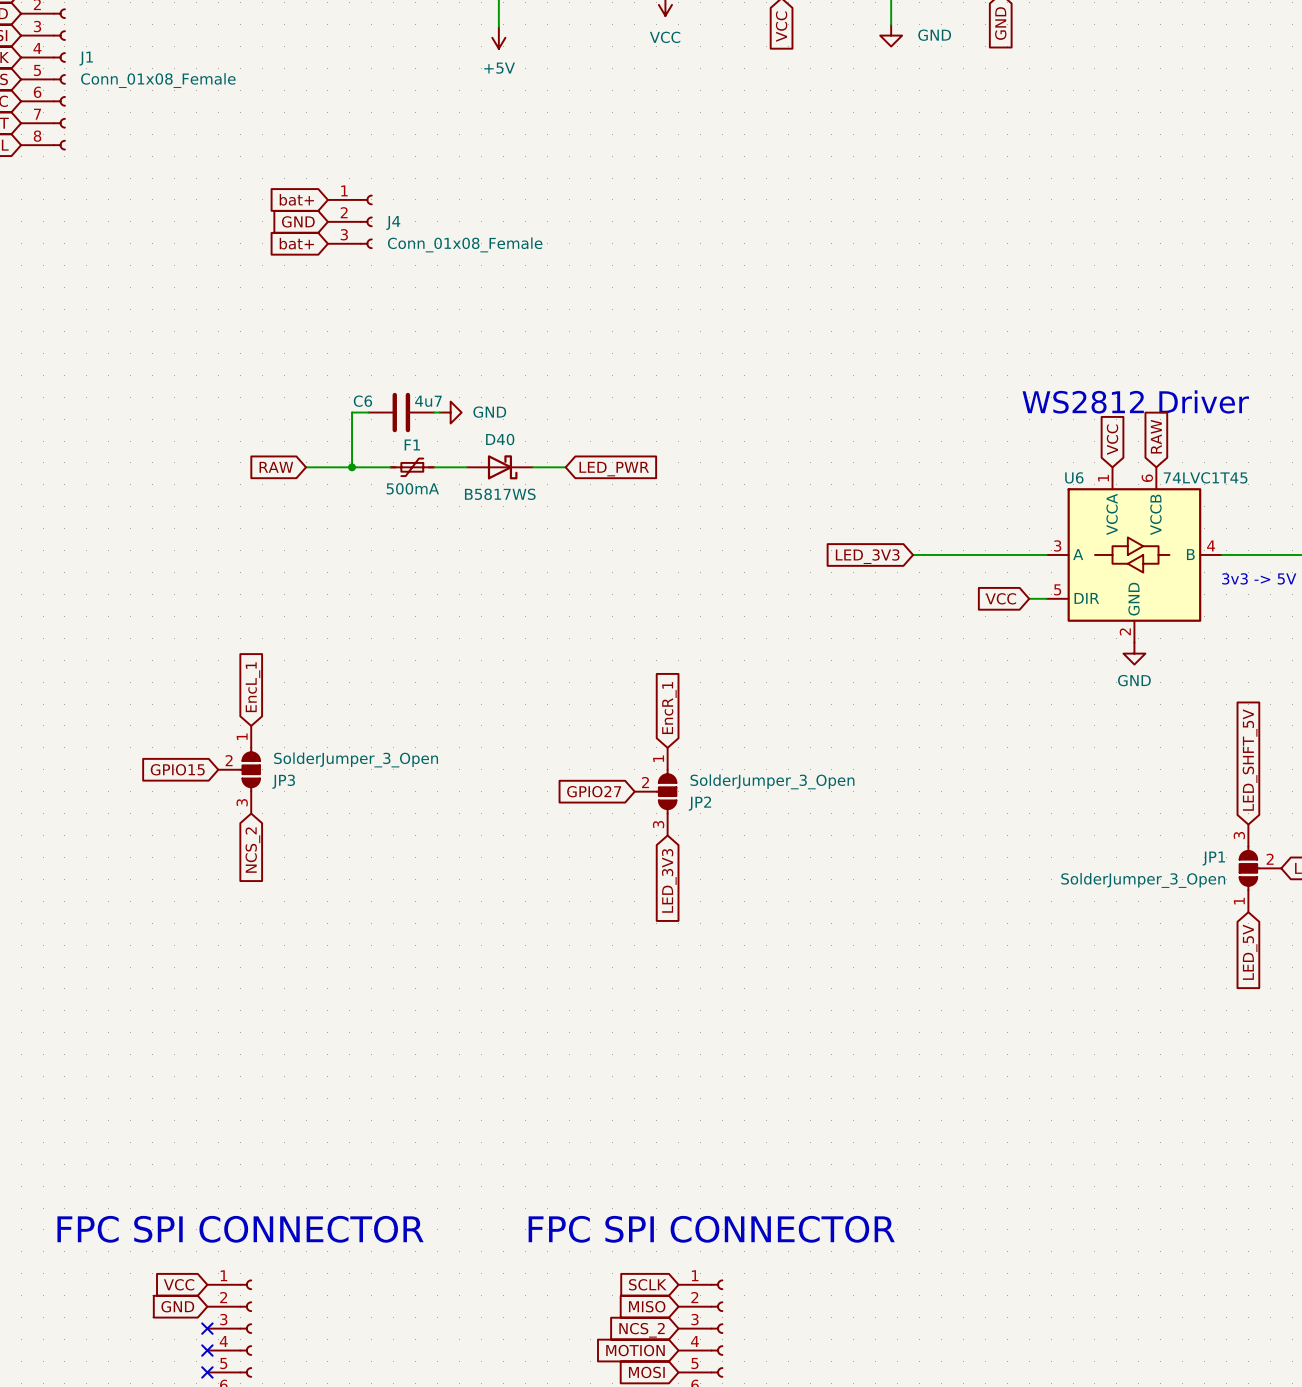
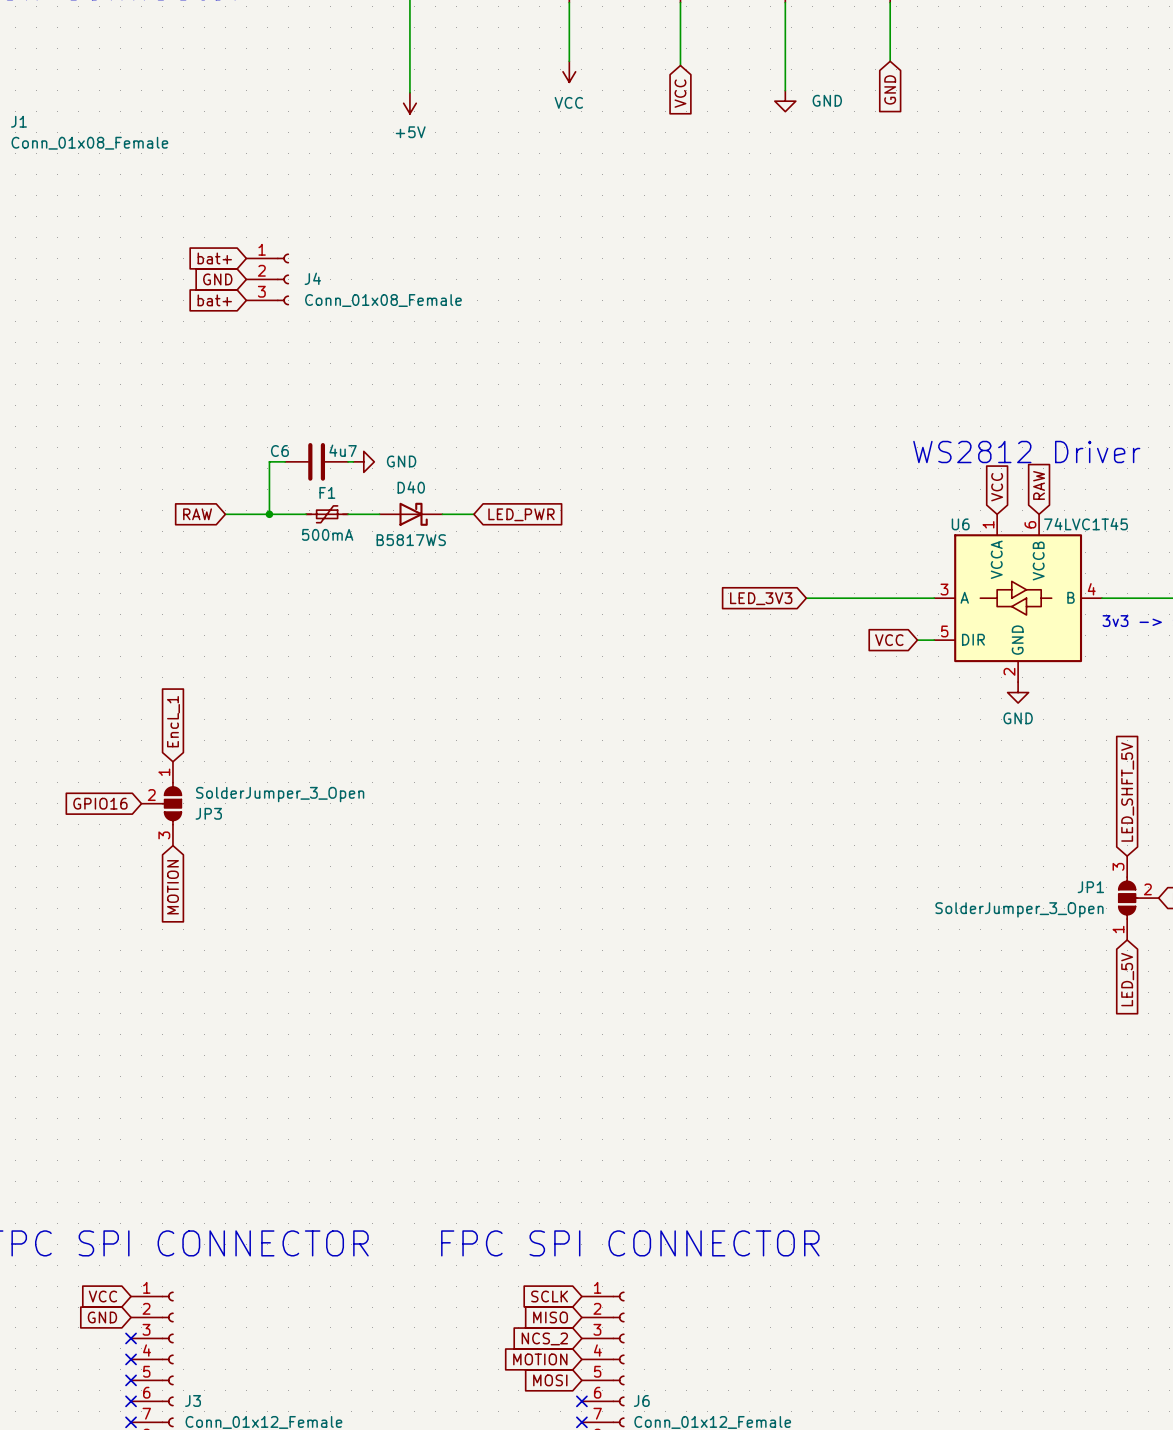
global label: EncR_1 (669, 708) -> none
global label: GPIO15 (177, 769) -> GPIO16 (100, 803)
global label: GPIO27 (594, 791) -> none
JP2: SolderJumper_3_Open (655, 791) -> none
global label: NCS_2 (252, 850) -> MOTION (172, 887)
global label: LED_3V3 (669, 880) -> none

